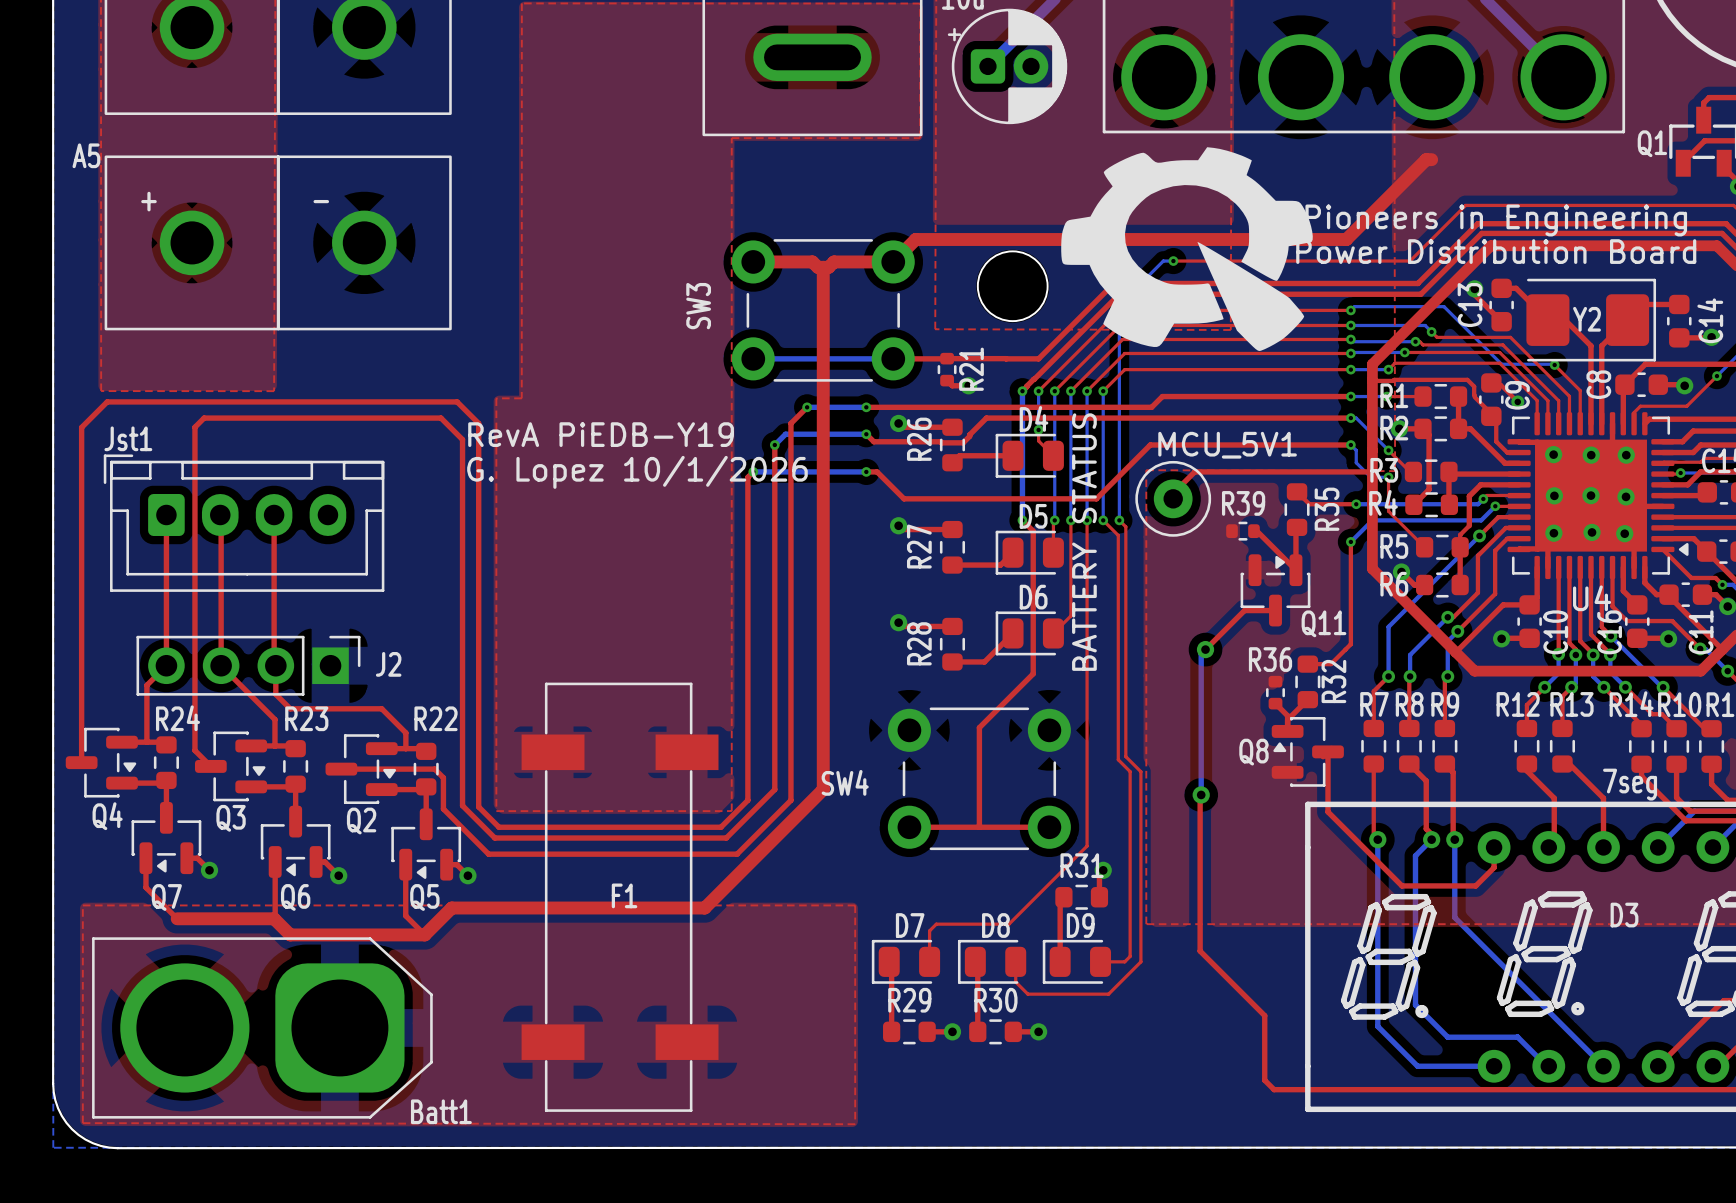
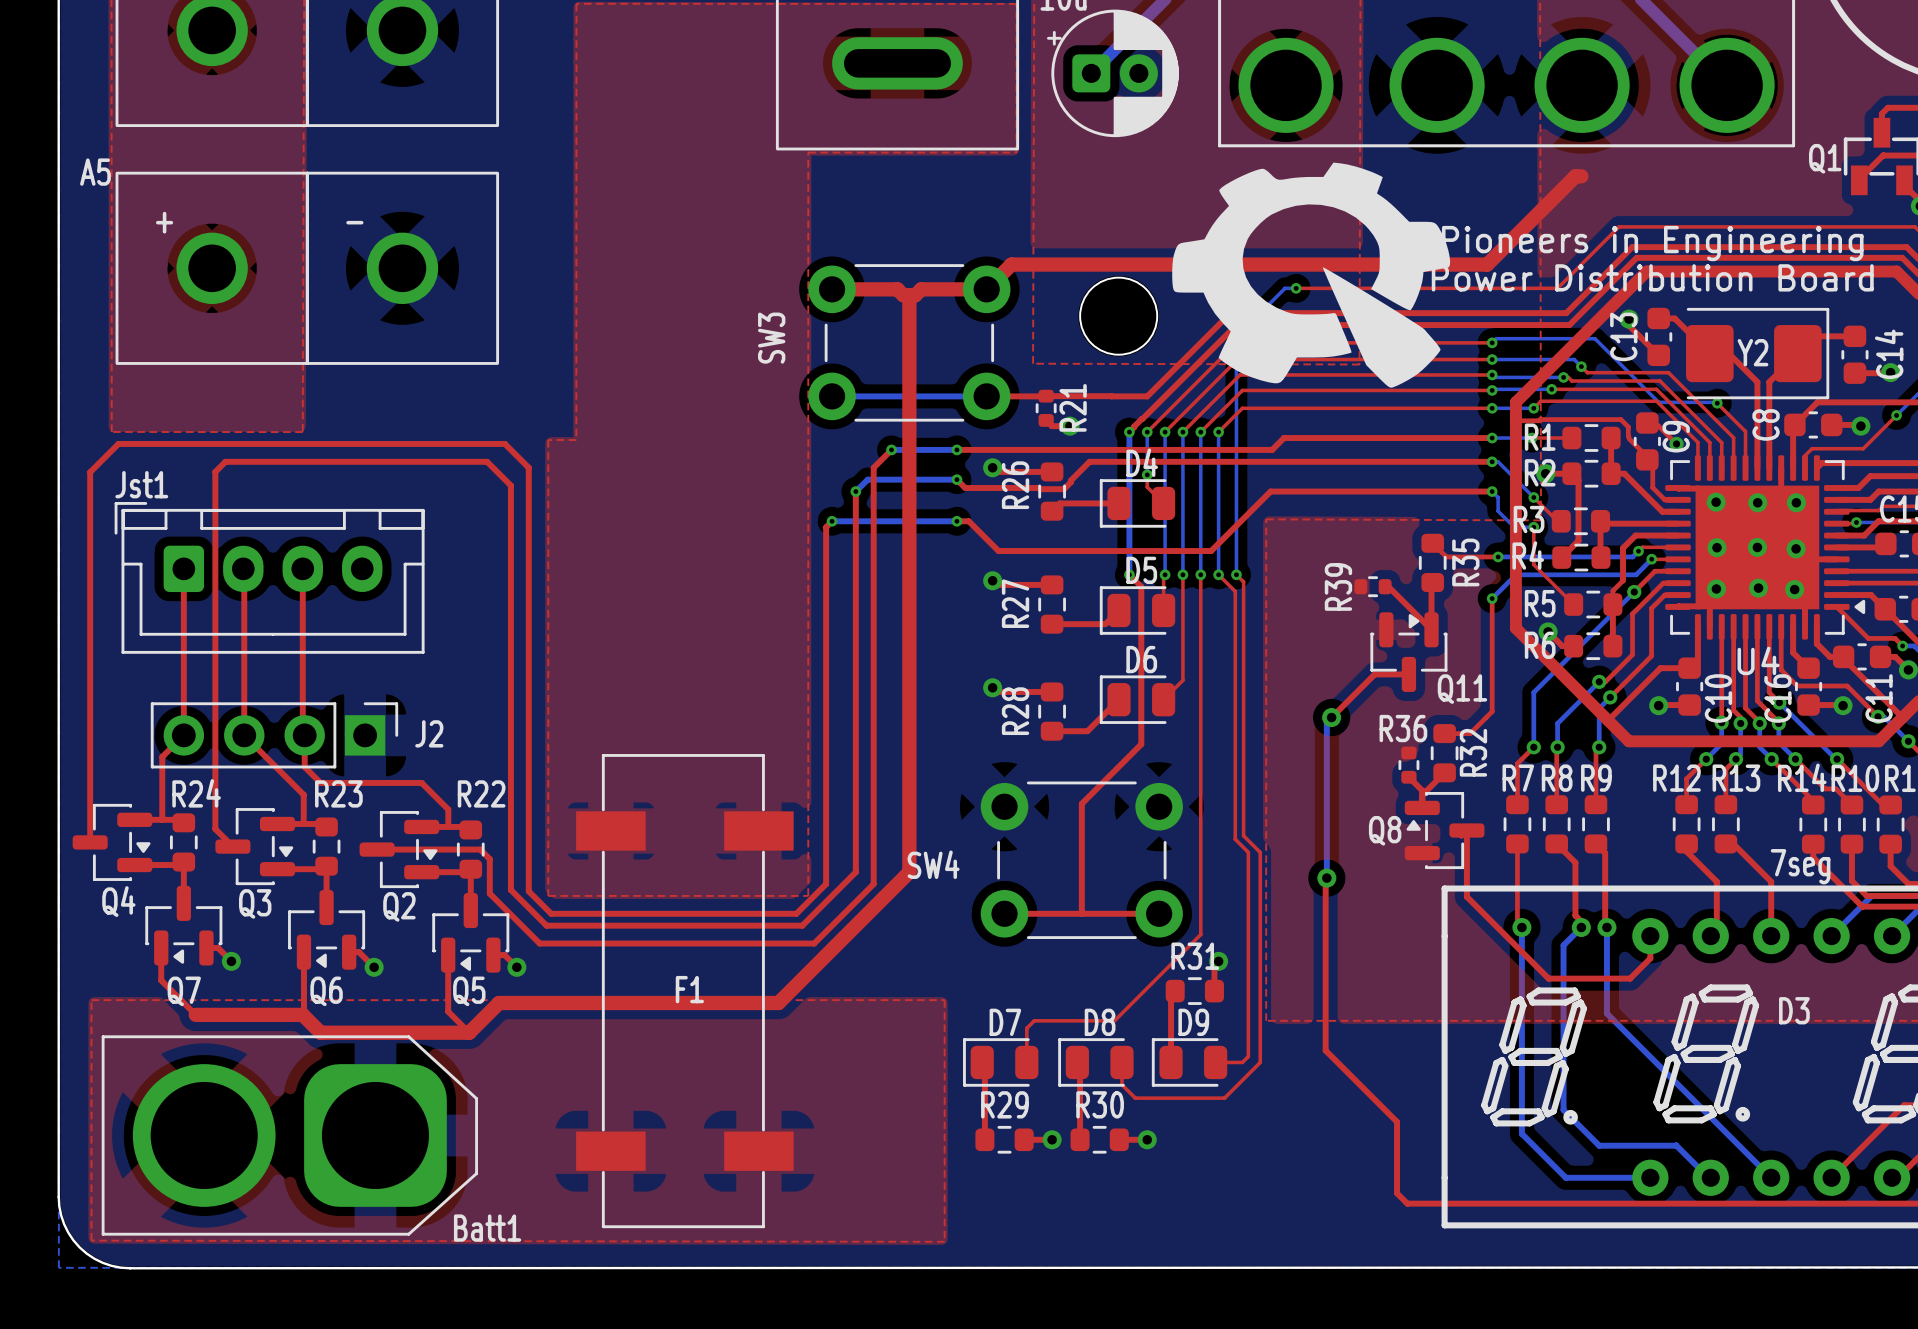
text: RevA PiEDB-Y19 (601, 434) -> none
top track: (1372, 471) (1194, 471) (1173, 493) -> none
text: G. Lopez 10/1/2026 (637, 472) -> none
MCU_5V1: (1173, 498) -> none
R39 name rotation: 0° (1243, 503) -> 90° counterclockwise (1338, 586)
text: BATTERY STATUS (1084, 542) -> none

